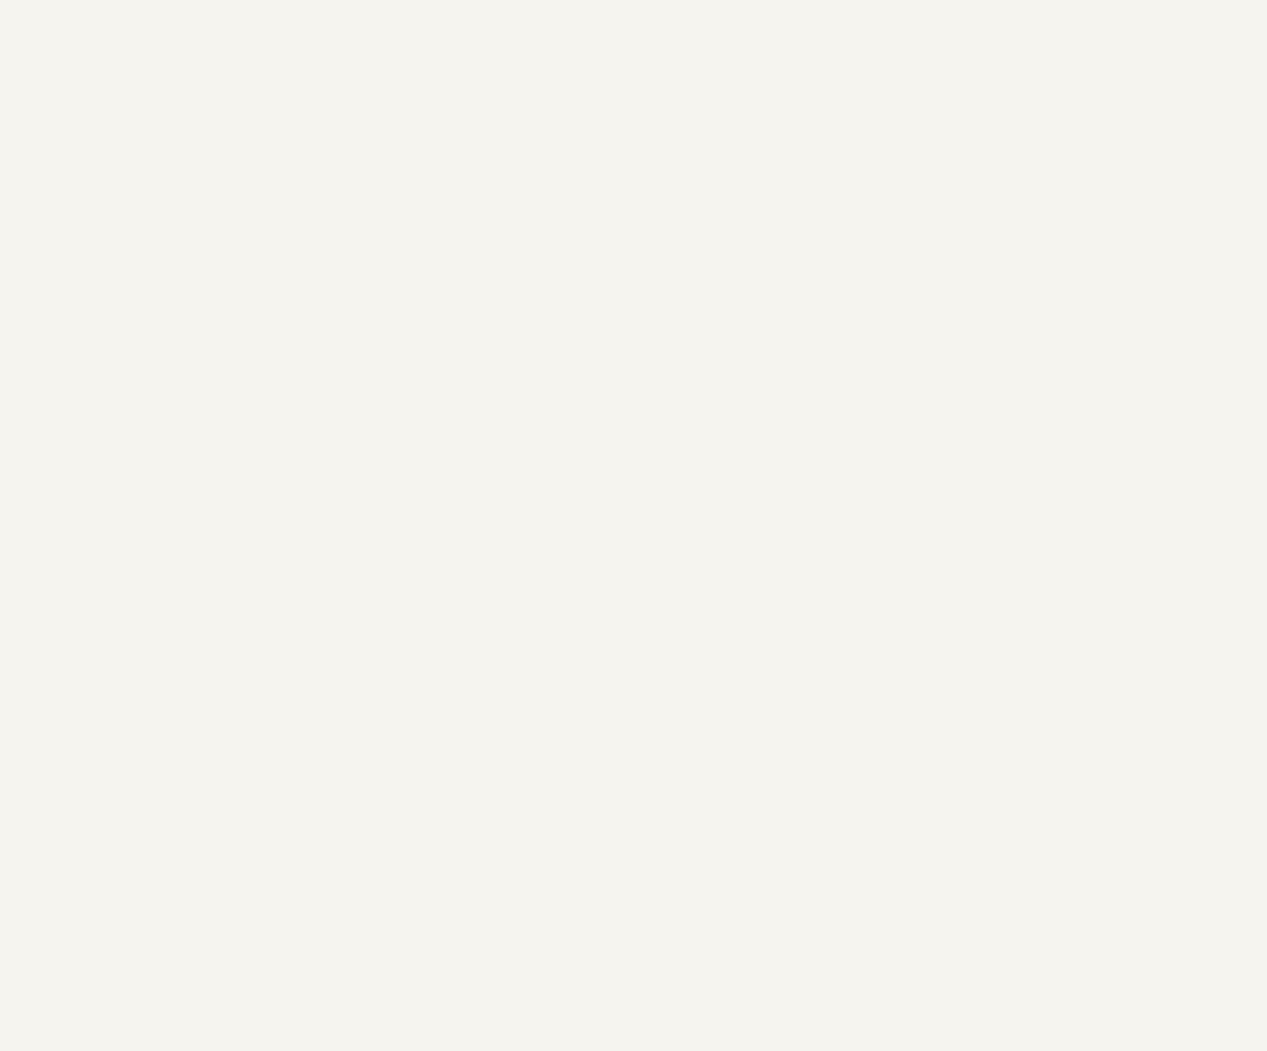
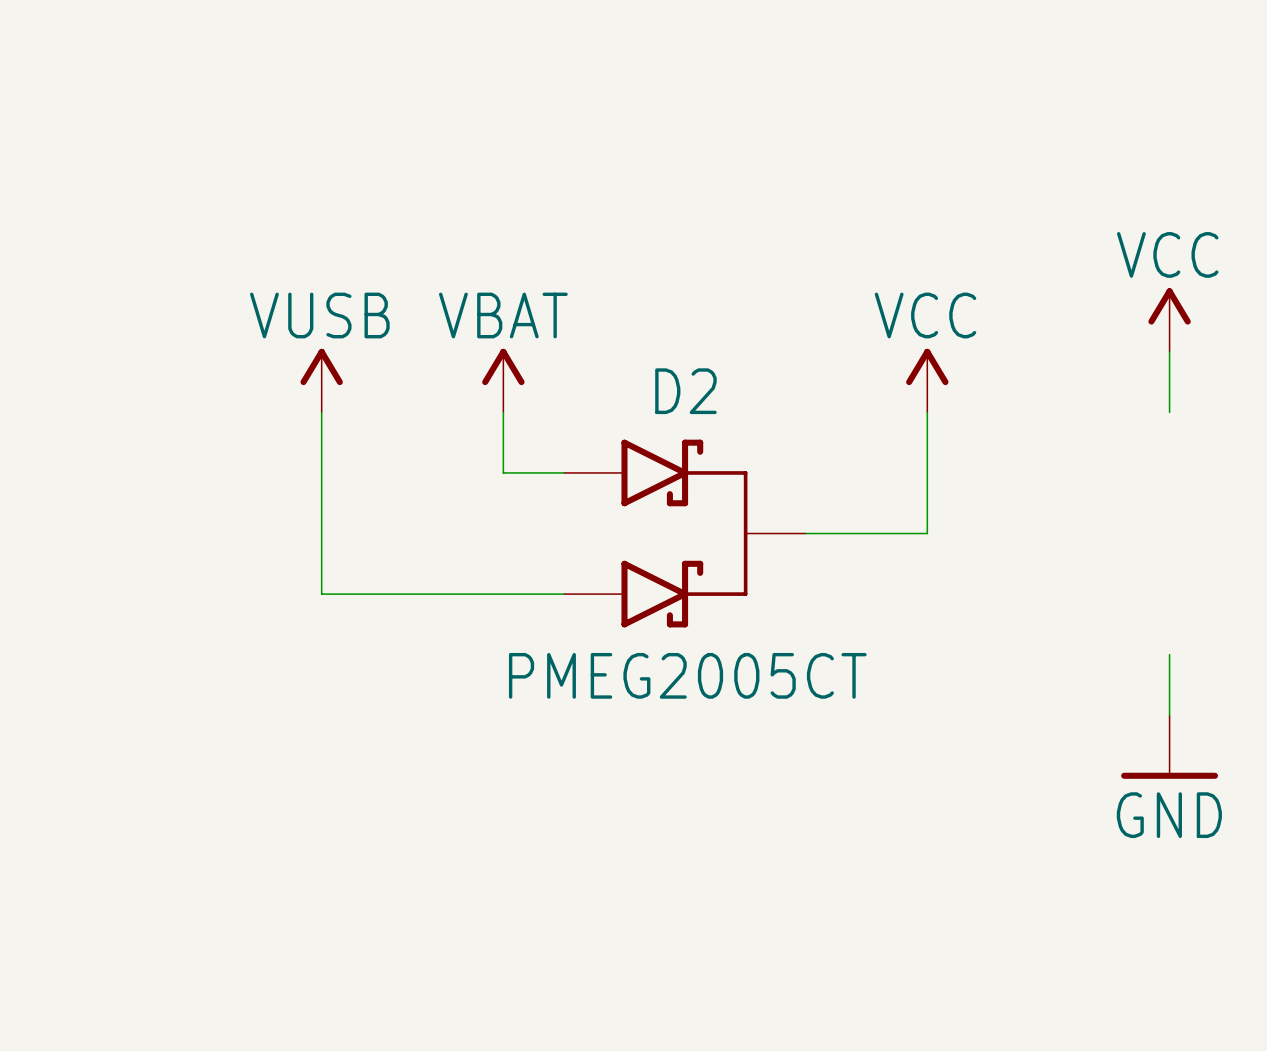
power symbol: none -> VCC (1169, 320)
wire: none -> (1169, 351) (1169, 412)
power symbol: none -> VUSB (321, 380)
power symbol: none -> VBAT (503, 380)
power symbol: none -> VCC (927, 380)
wire: none -> (321, 412) (321, 594) (563, 594)
wire: none -> (503, 412) (503, 472) (563, 472)
wire: none -> (927, 412) (927, 533) (806, 533)
D2: none -> PMEG2005CT (685, 533)
wire: none -> (1169, 654) (1169, 715)
power symbol: none -> GND (1169, 747)

